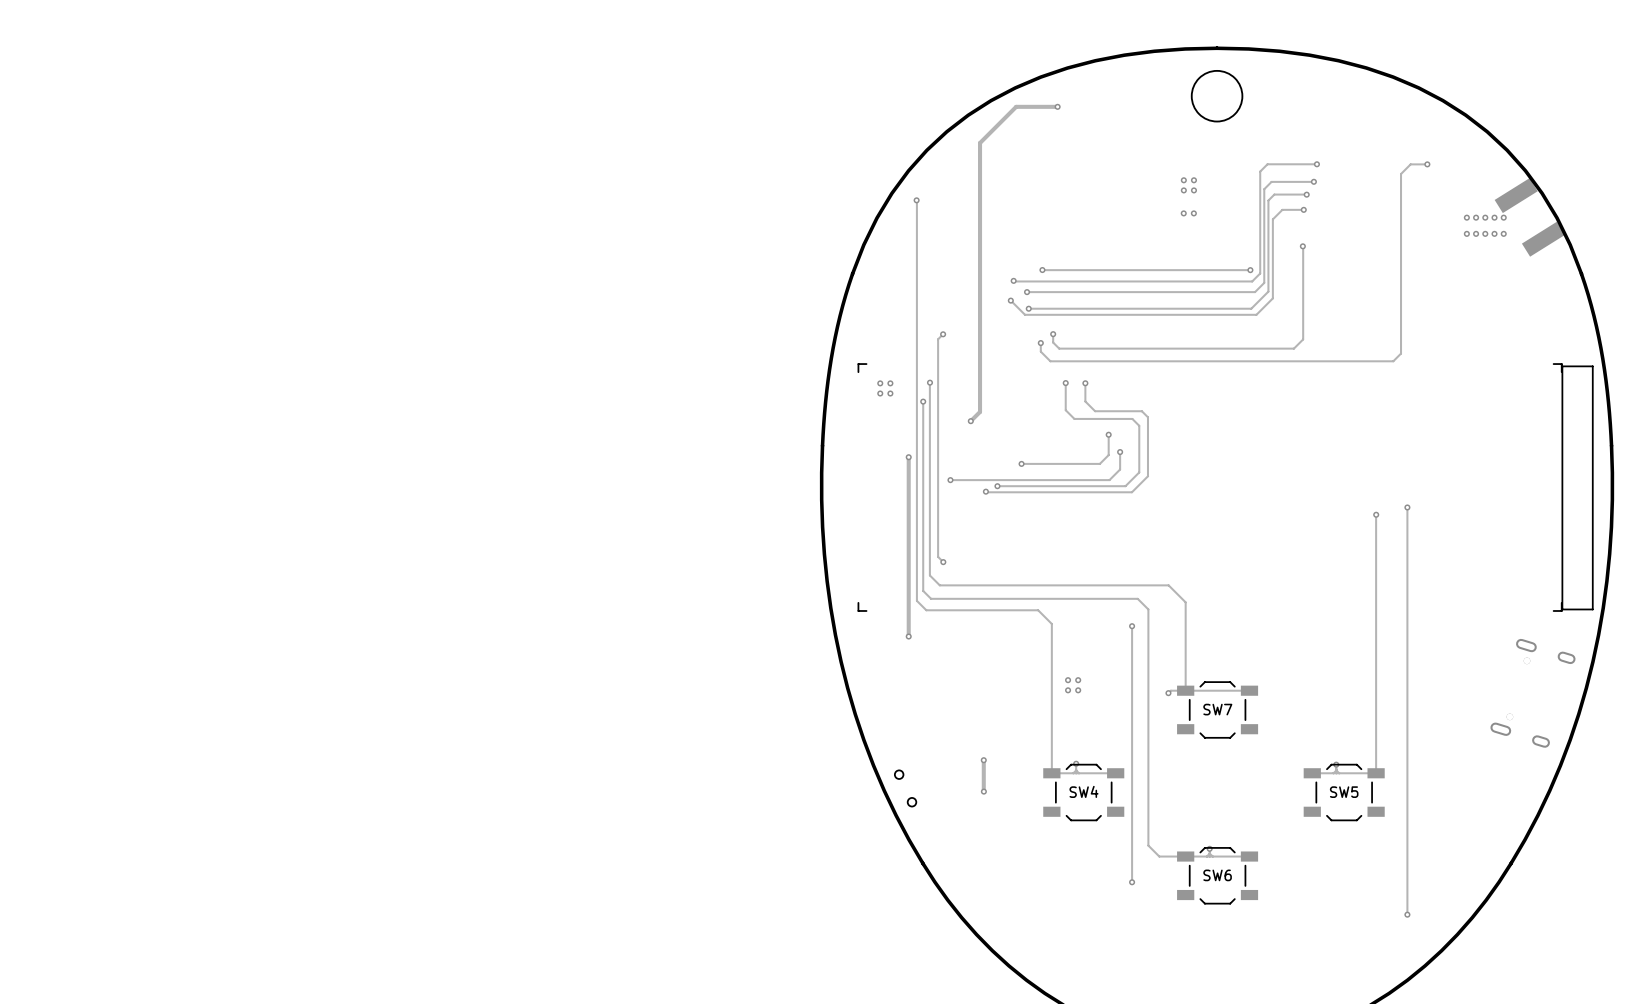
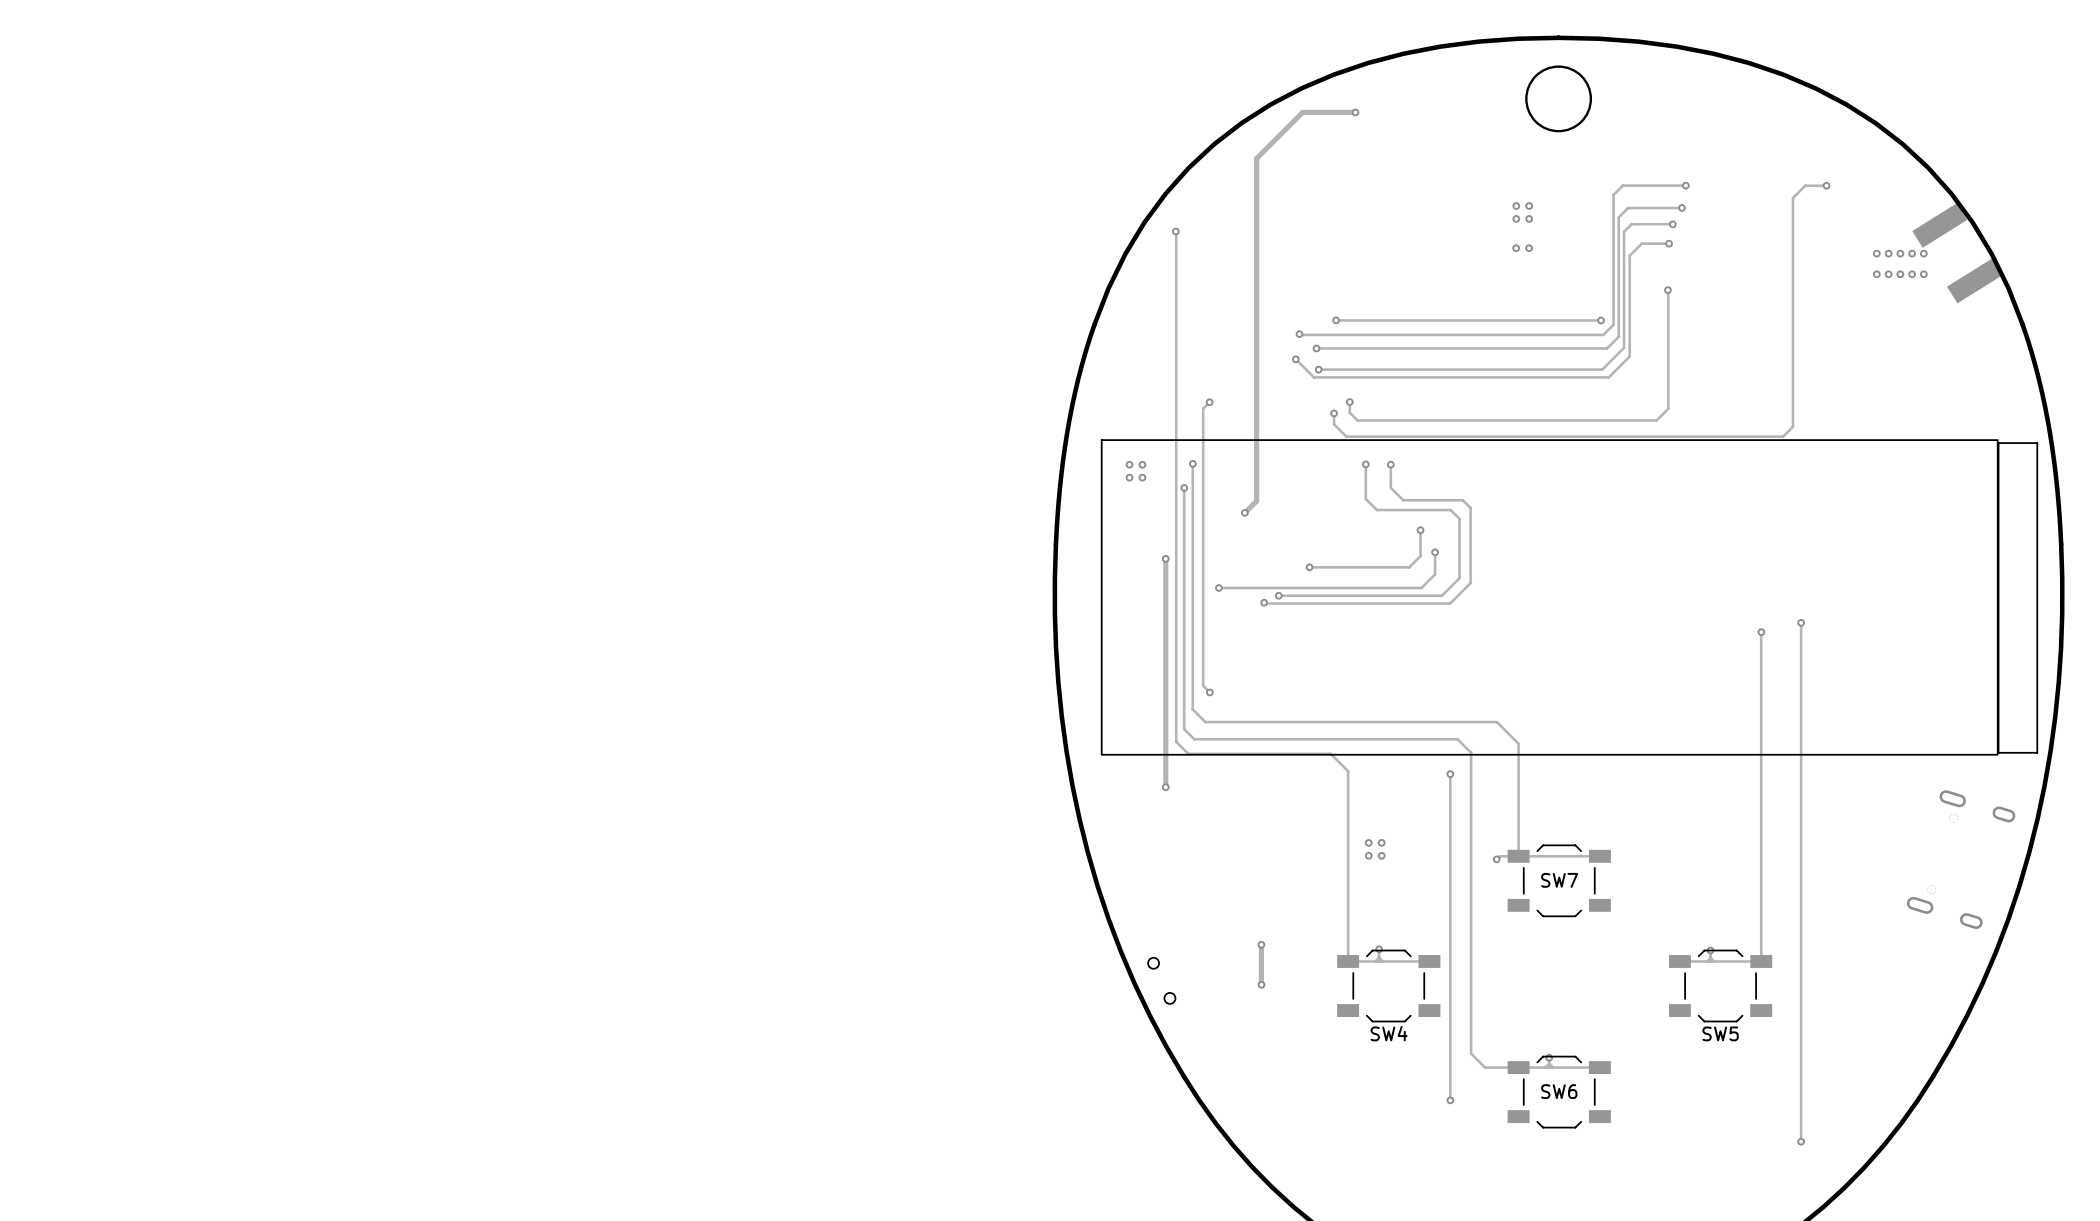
drawing shape: [857, 363, 1563, 612] -> [1101, 439, 1999, 756]
SW4 name position: SW4 (1084, 791) -> SW4 (1389, 1033)
SW5 name position: SW5 (1344, 792) -> SW5 (1720, 1033)

